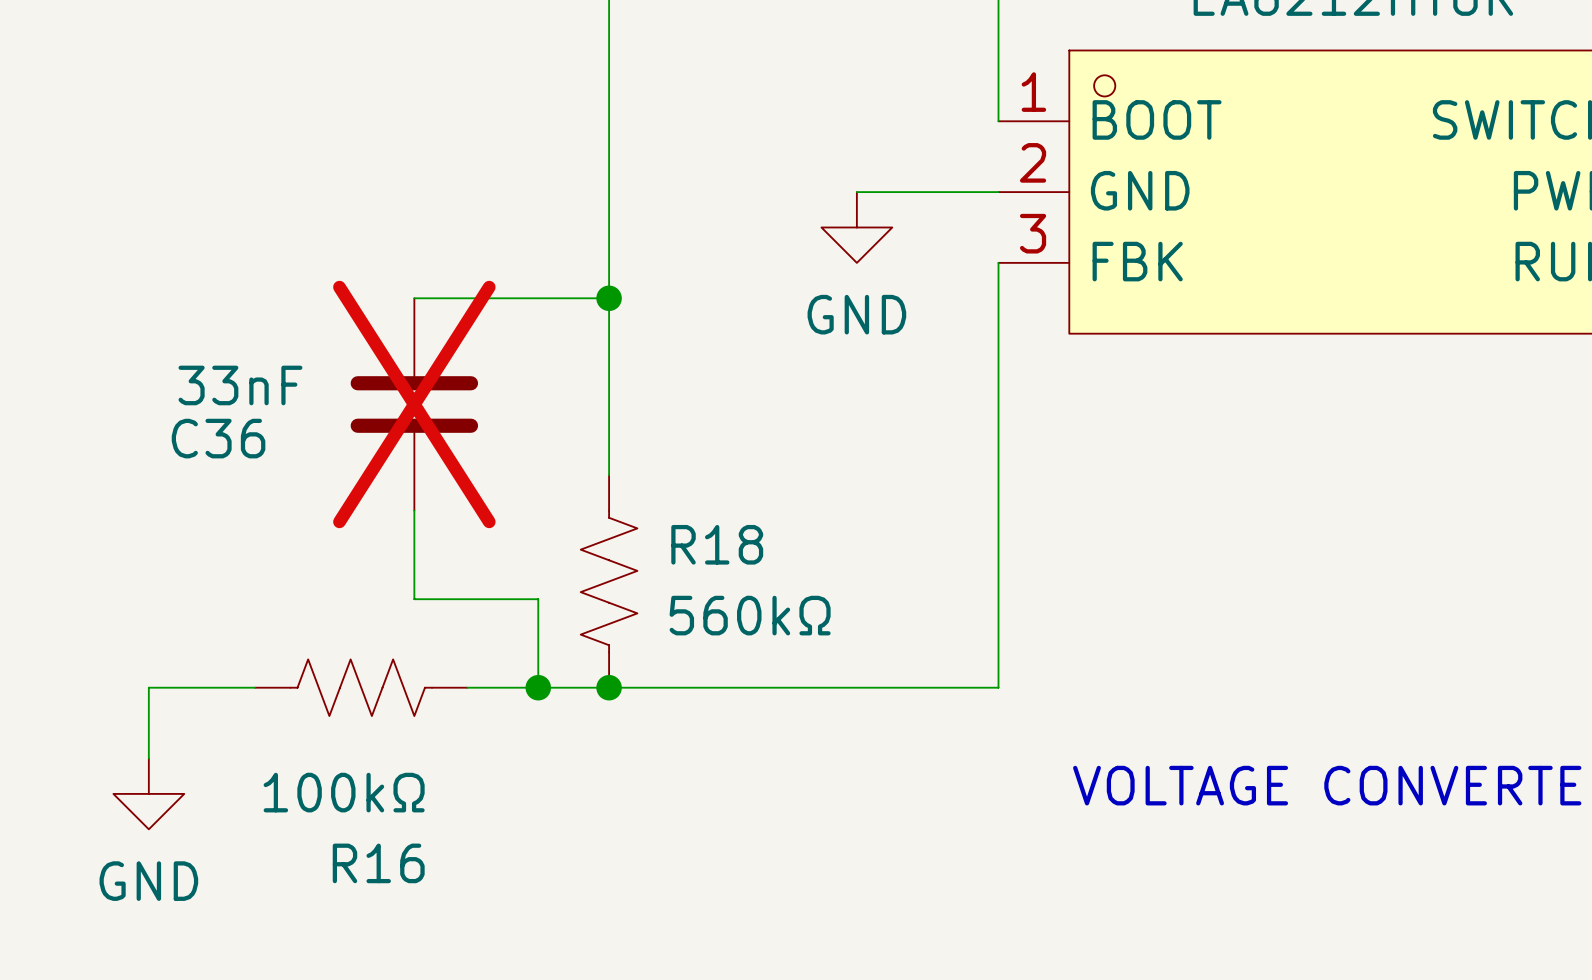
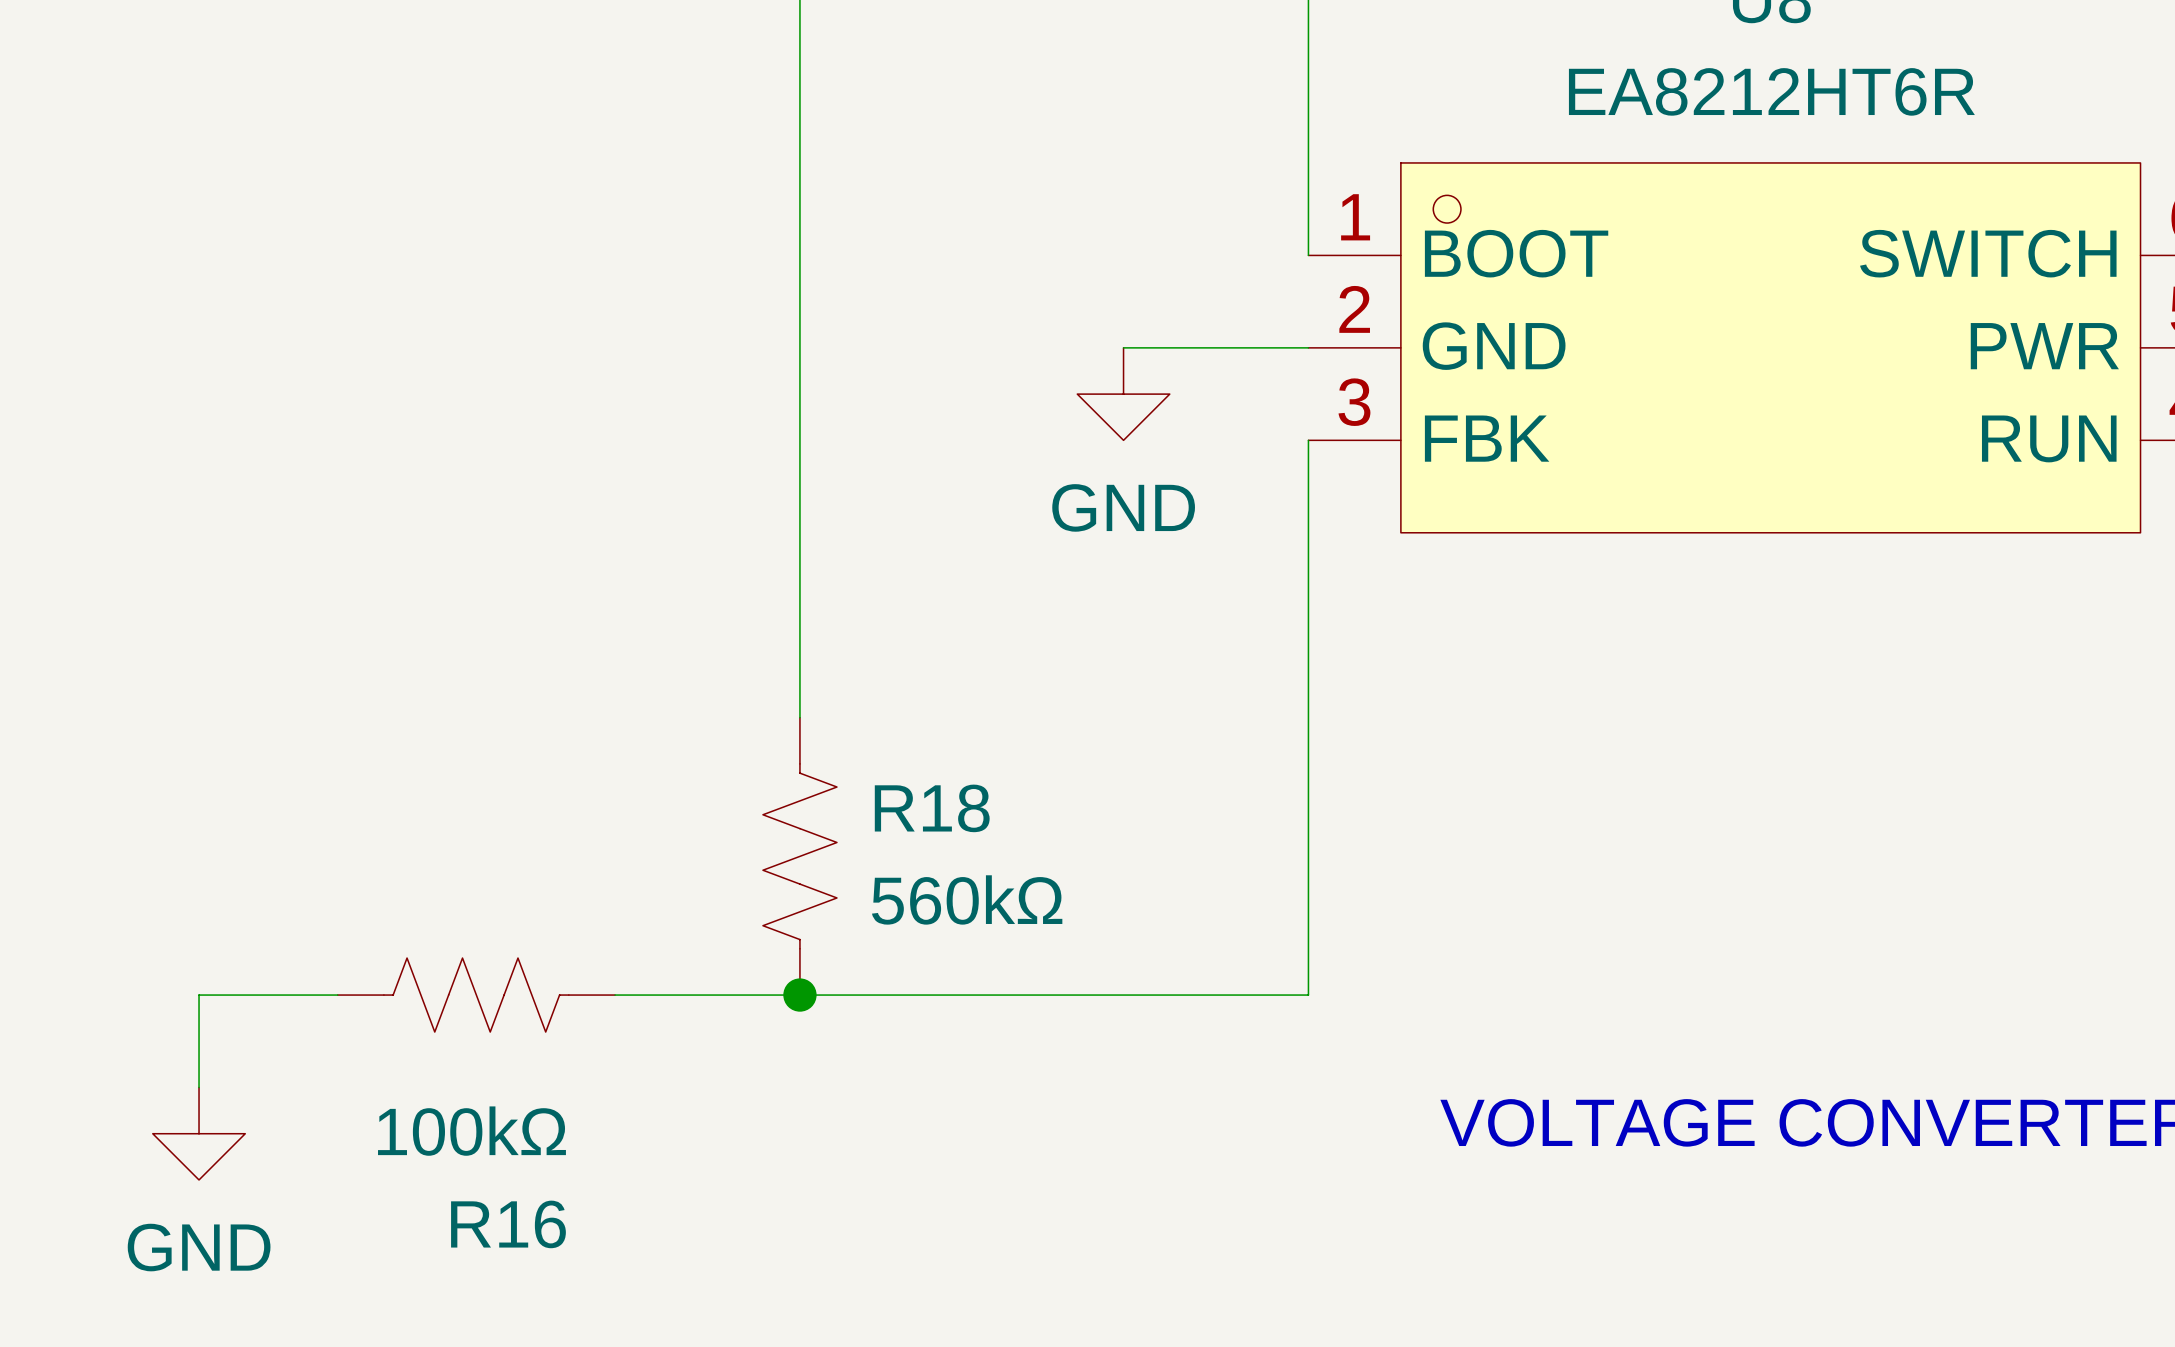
wire: (414, 298) (609, 298) -> none
junction: (609, 298) -> none
C36: 33nF (414, 404) -> none
wire: (414, 510) (414, 599) (538, 599) (538, 687) -> none
junction: (538, 687) -> none

